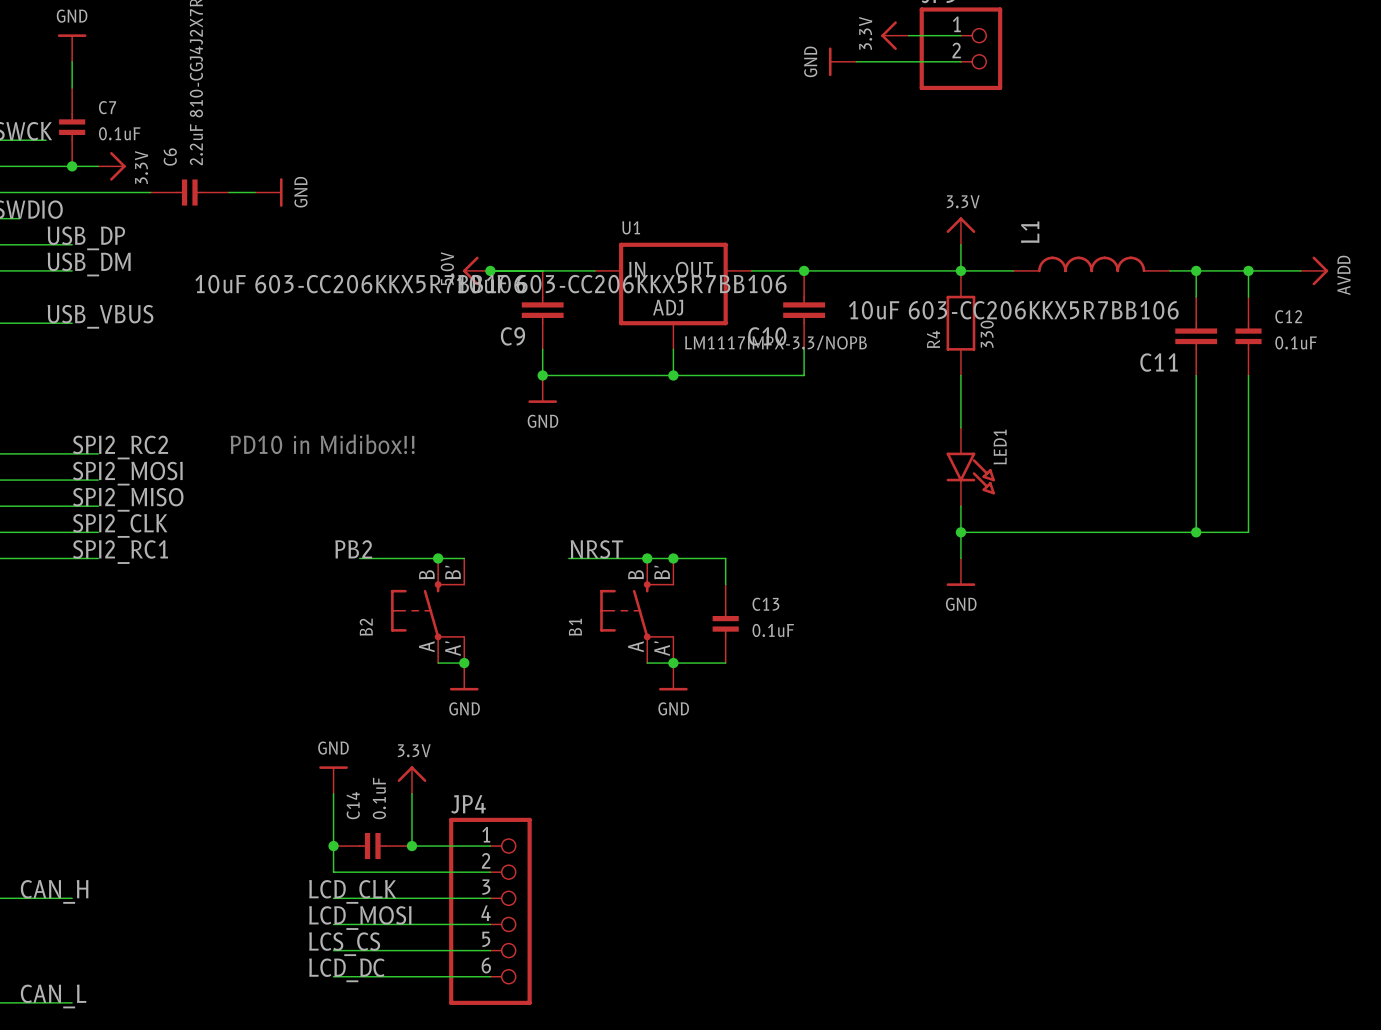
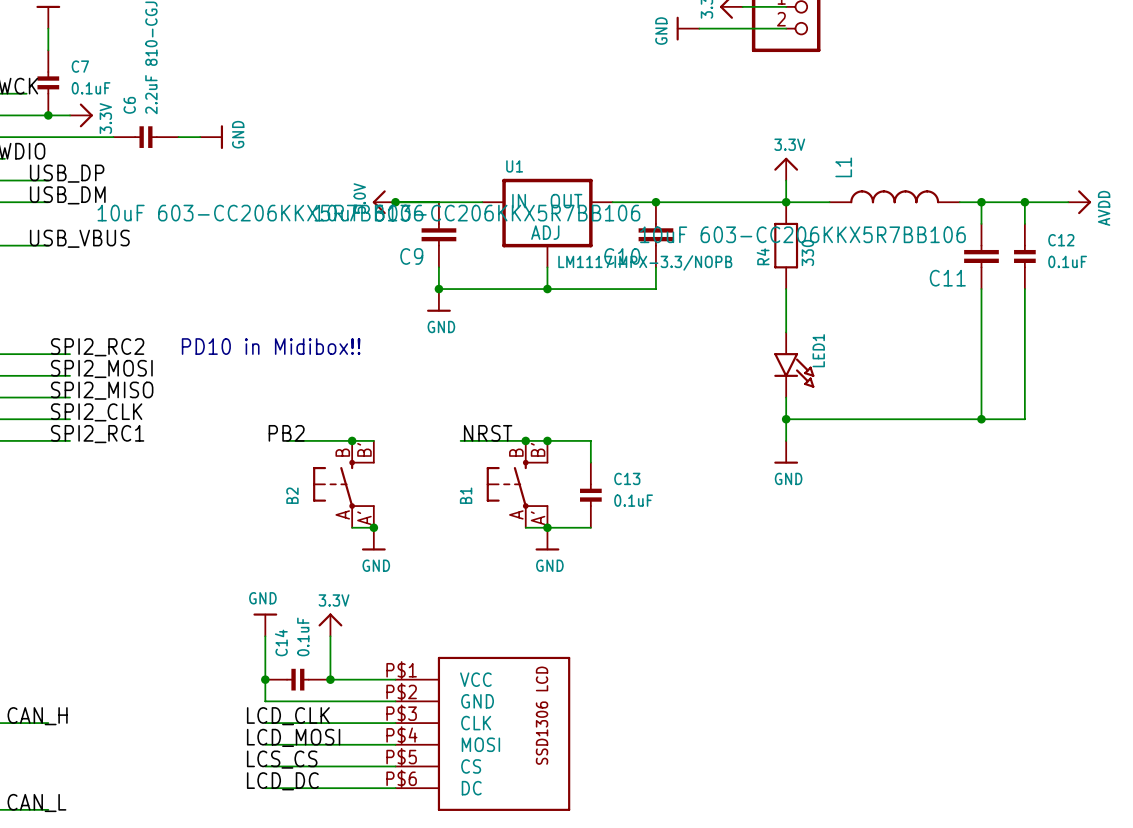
JP4: (490, 911) -> none
part: none -> (482, 733)

